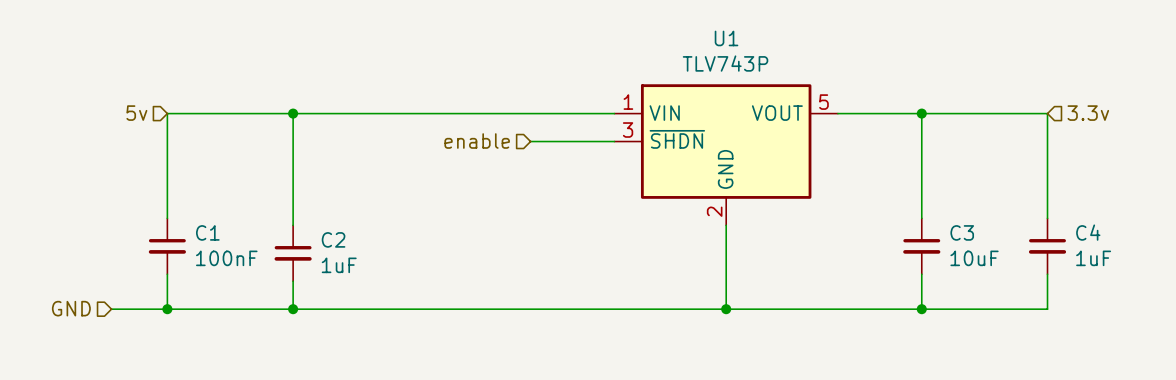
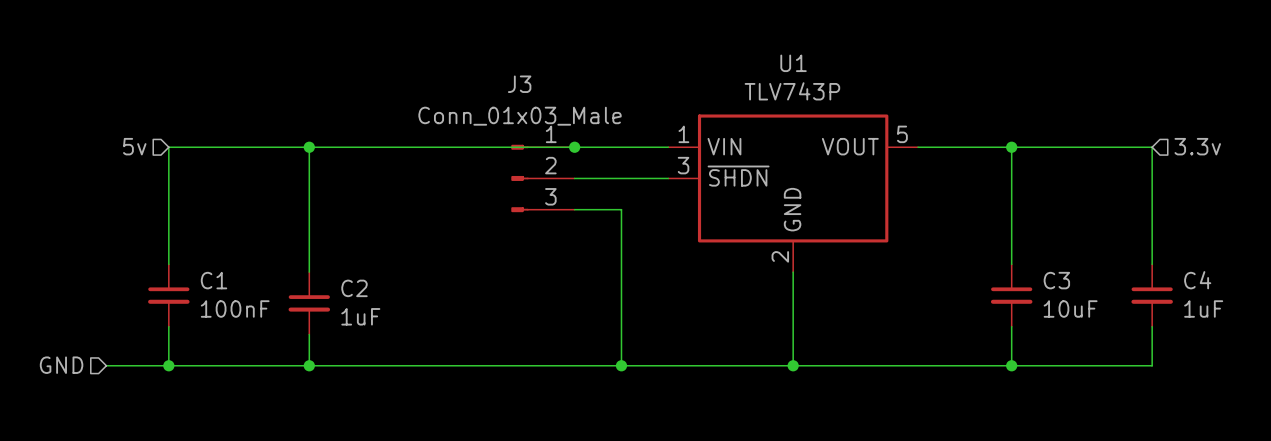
junction: none -> (574, 147)
hierarchical label: enable (477, 141) -> none
J3: none -> Conn_01x03_Male (542, 178)
wire: none -> (574, 209) (621, 209) (621, 365)
junction: none -> (621, 365)

